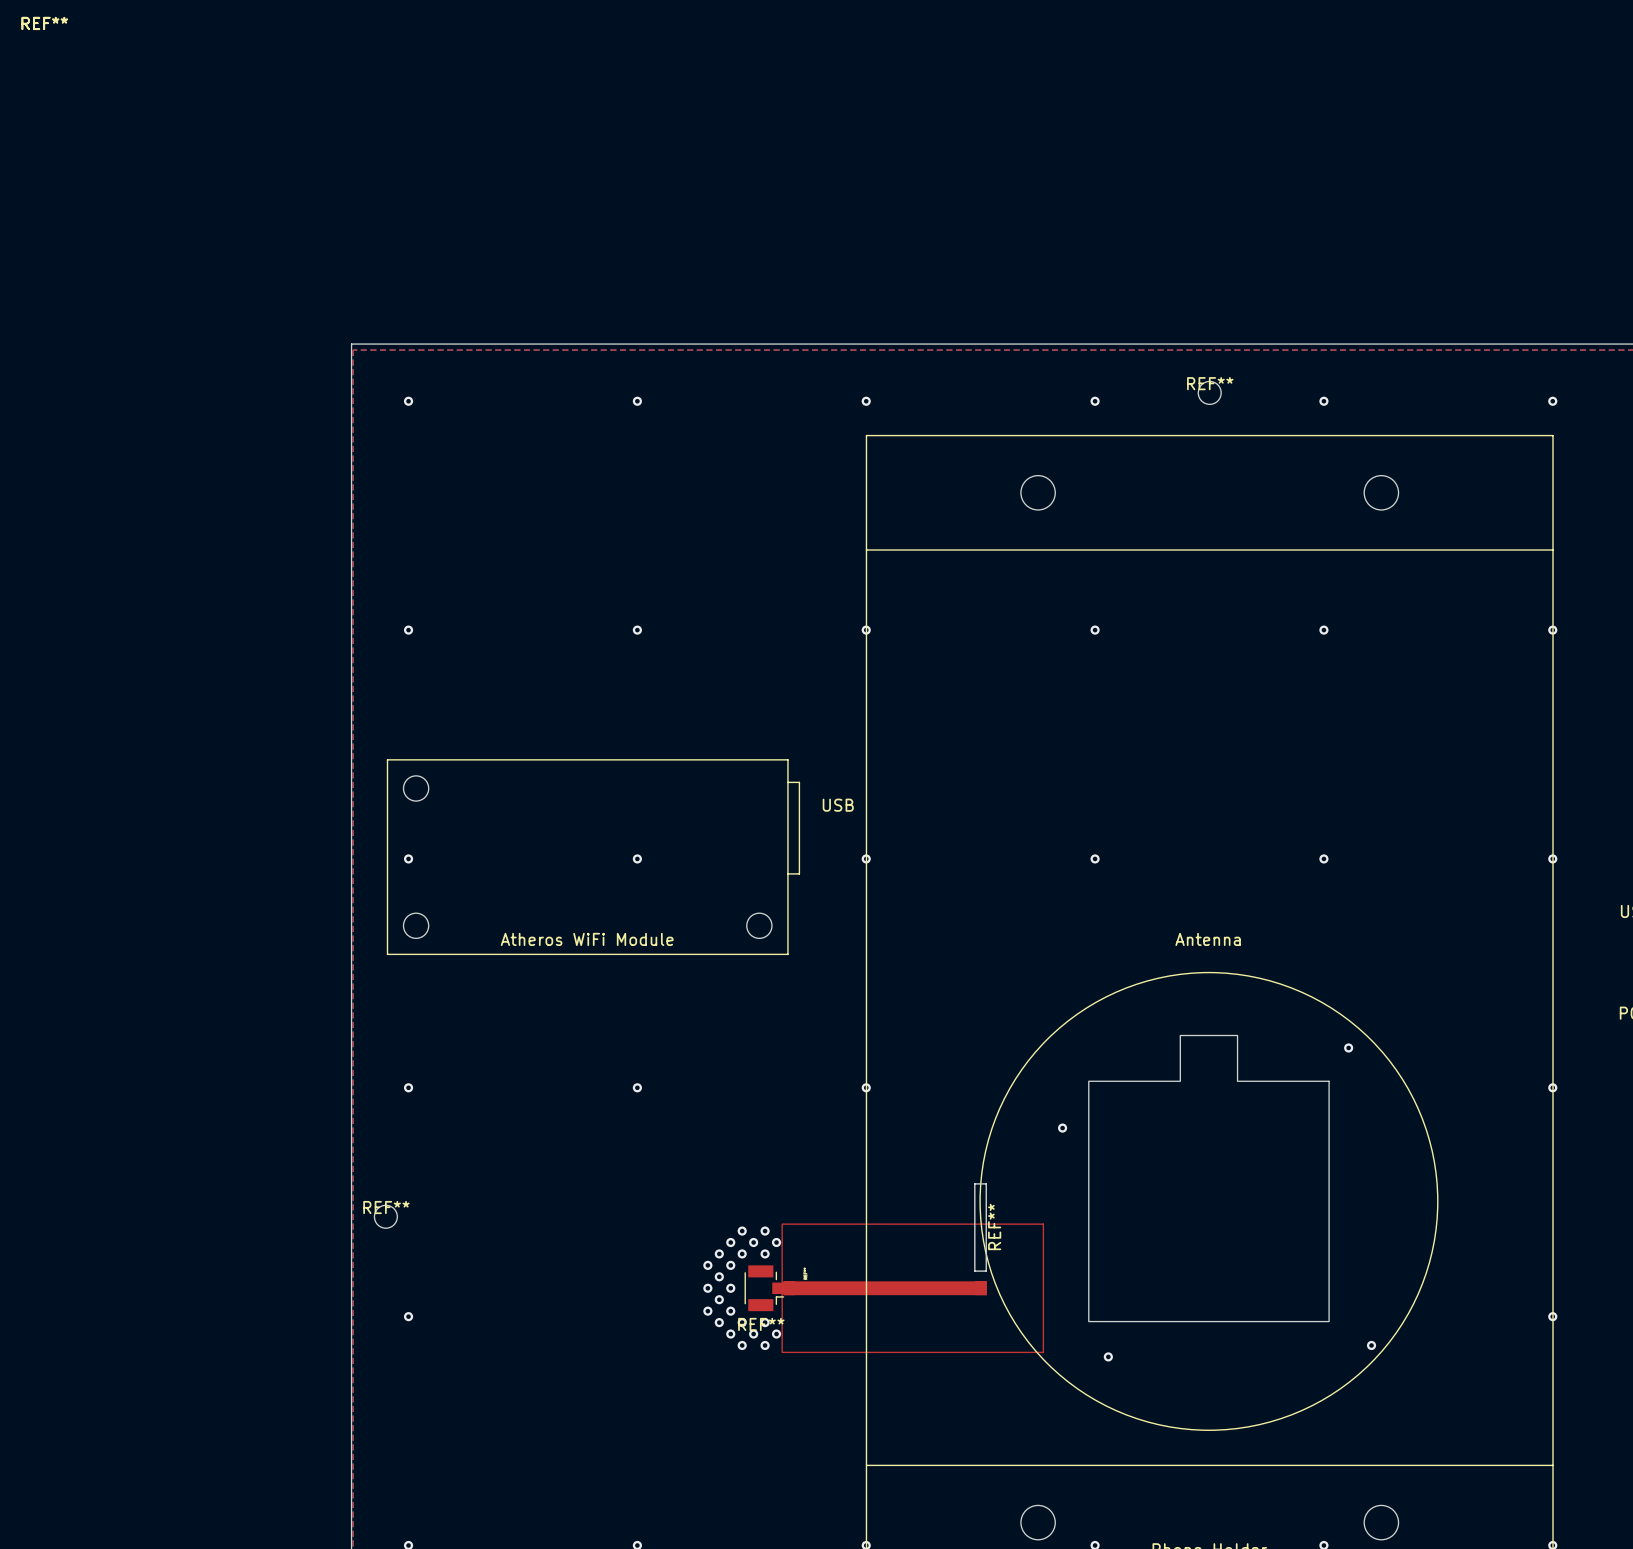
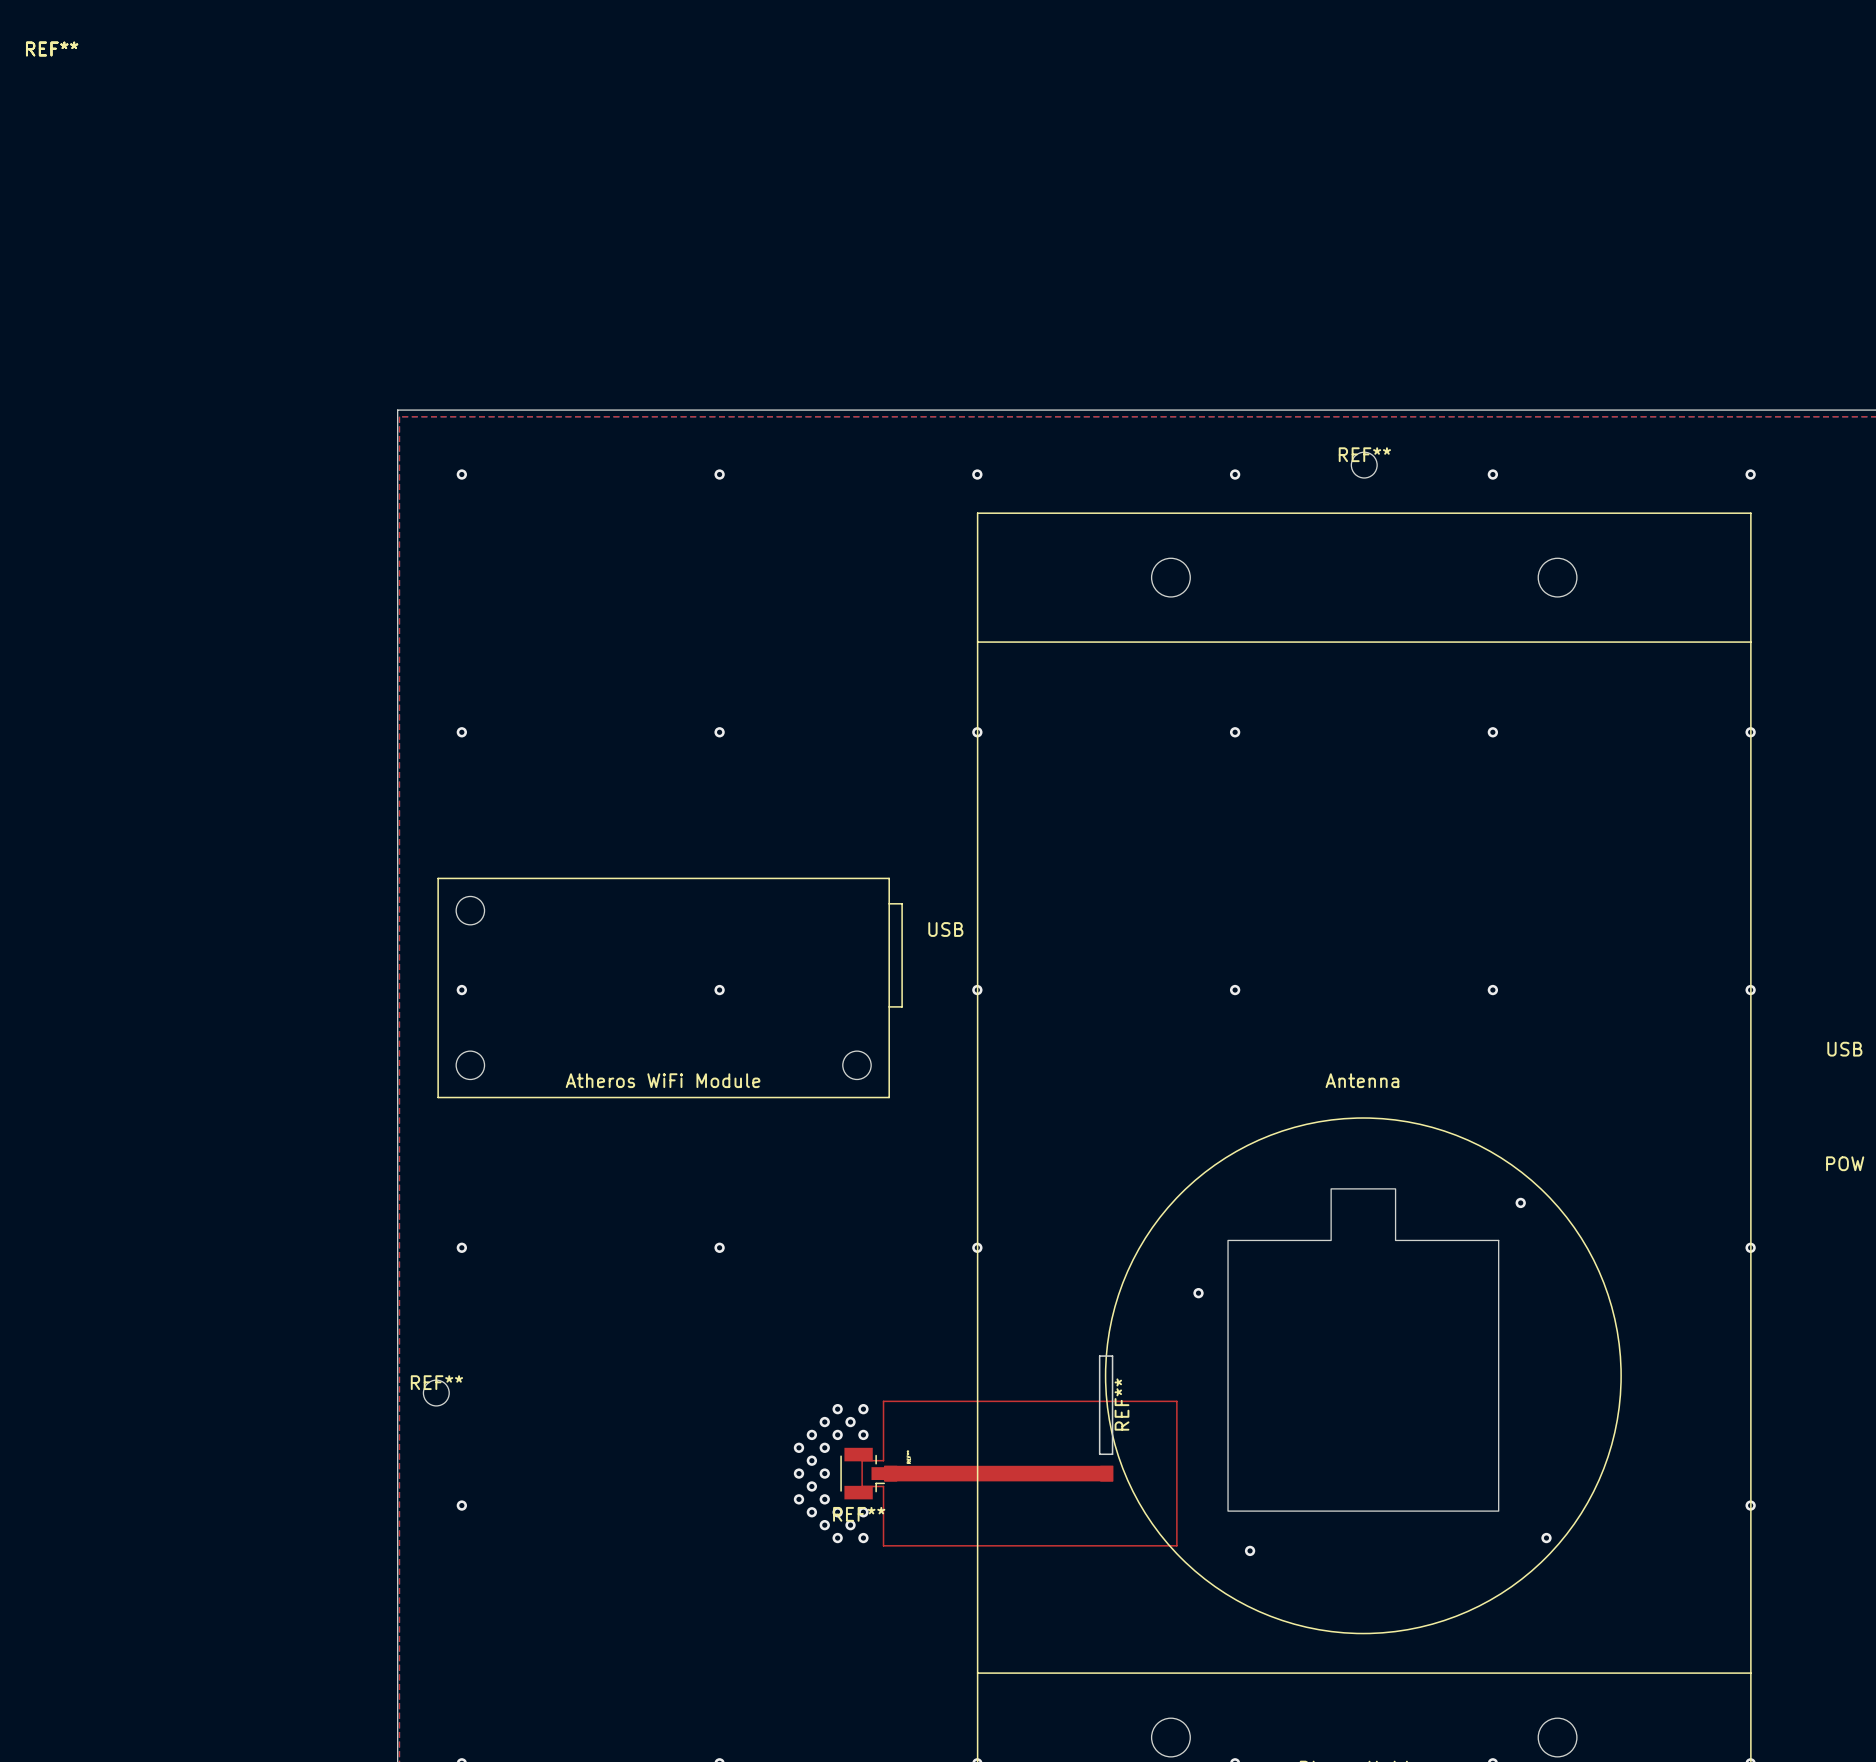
part footprint: [781, 1223, 1045, 1354] -> [861, 1400, 1178, 1547]
via: (776, 1242) -> none
via: (776, 1334) -> none

